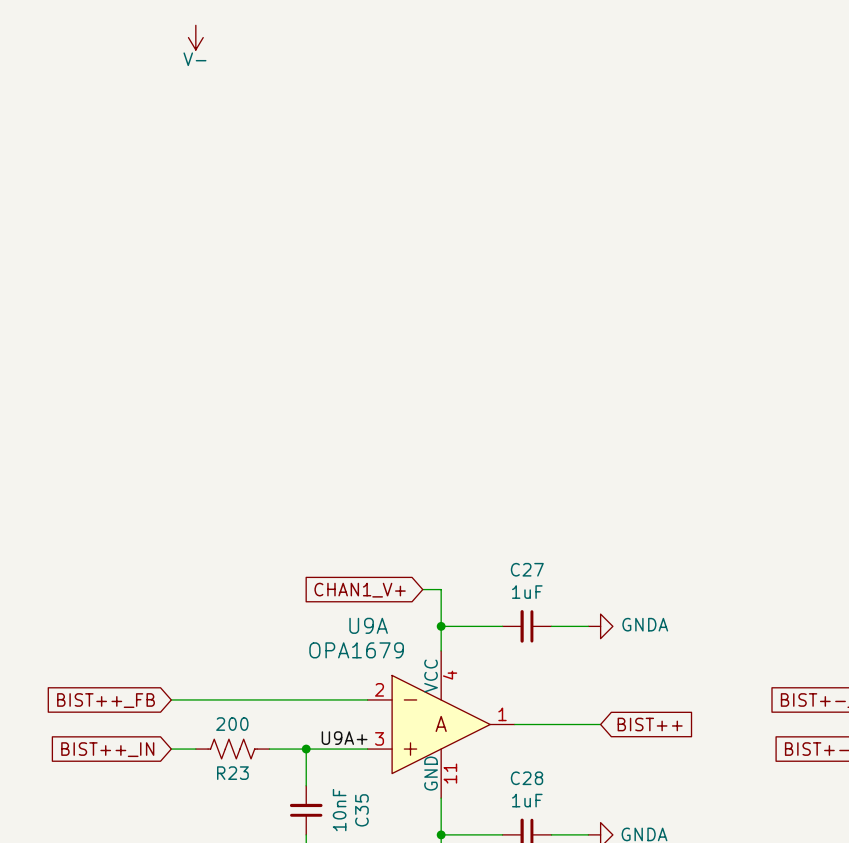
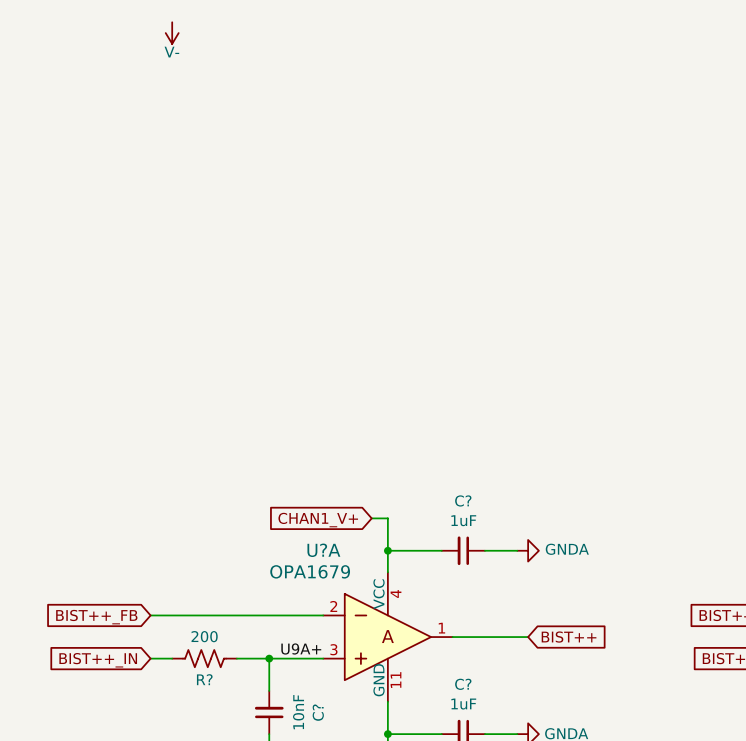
C27 name: C27 (527, 569) -> C? (463, 500)
U9A name: U9A (368, 625) -> U?A (323, 550)
R23 name: R23 (232, 773) -> R? (204, 679)
C28 name: C28 (527, 778) -> C? (463, 684)
C35 name: C35 (361, 810) -> C? (318, 712)

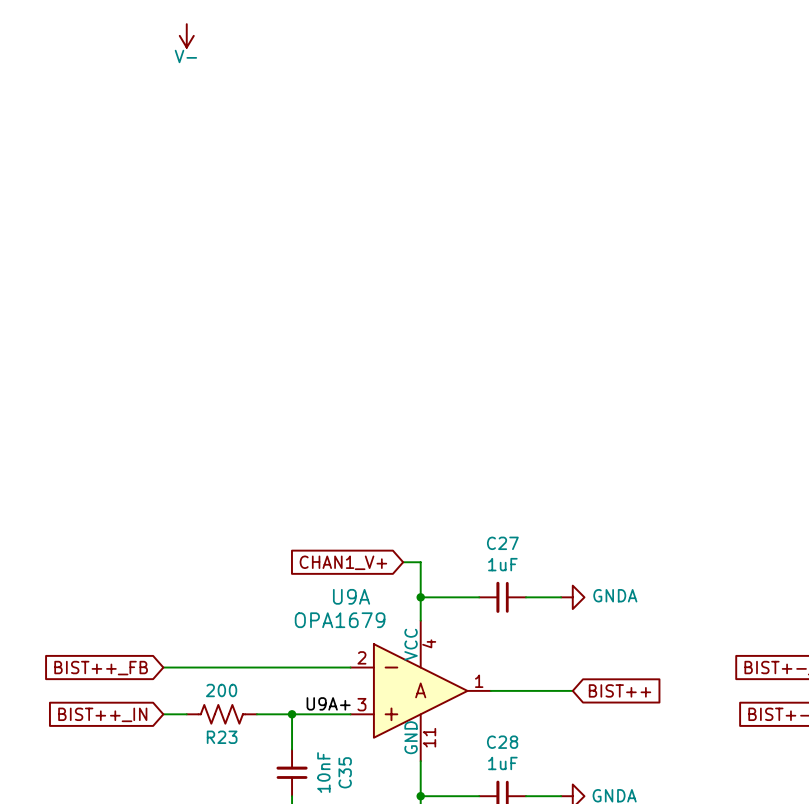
C? name: C? (463, 500) -> C27 (502, 543)
U?A name: U?A (323, 550) -> U9A (351, 596)
R? name: R? (204, 679) -> R23 (222, 737)
C? name: C? (463, 684) -> C28 (502, 742)
C? name: C? (318, 712) -> C35 (345, 772)

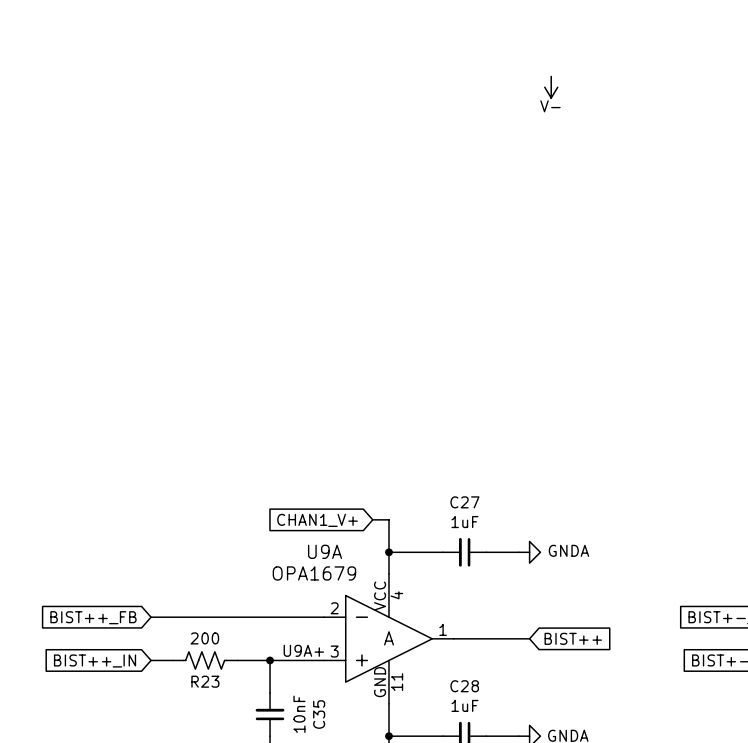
power symbol: V- (186, 35) -> none
power symbol: none -> V- (551, 87)

